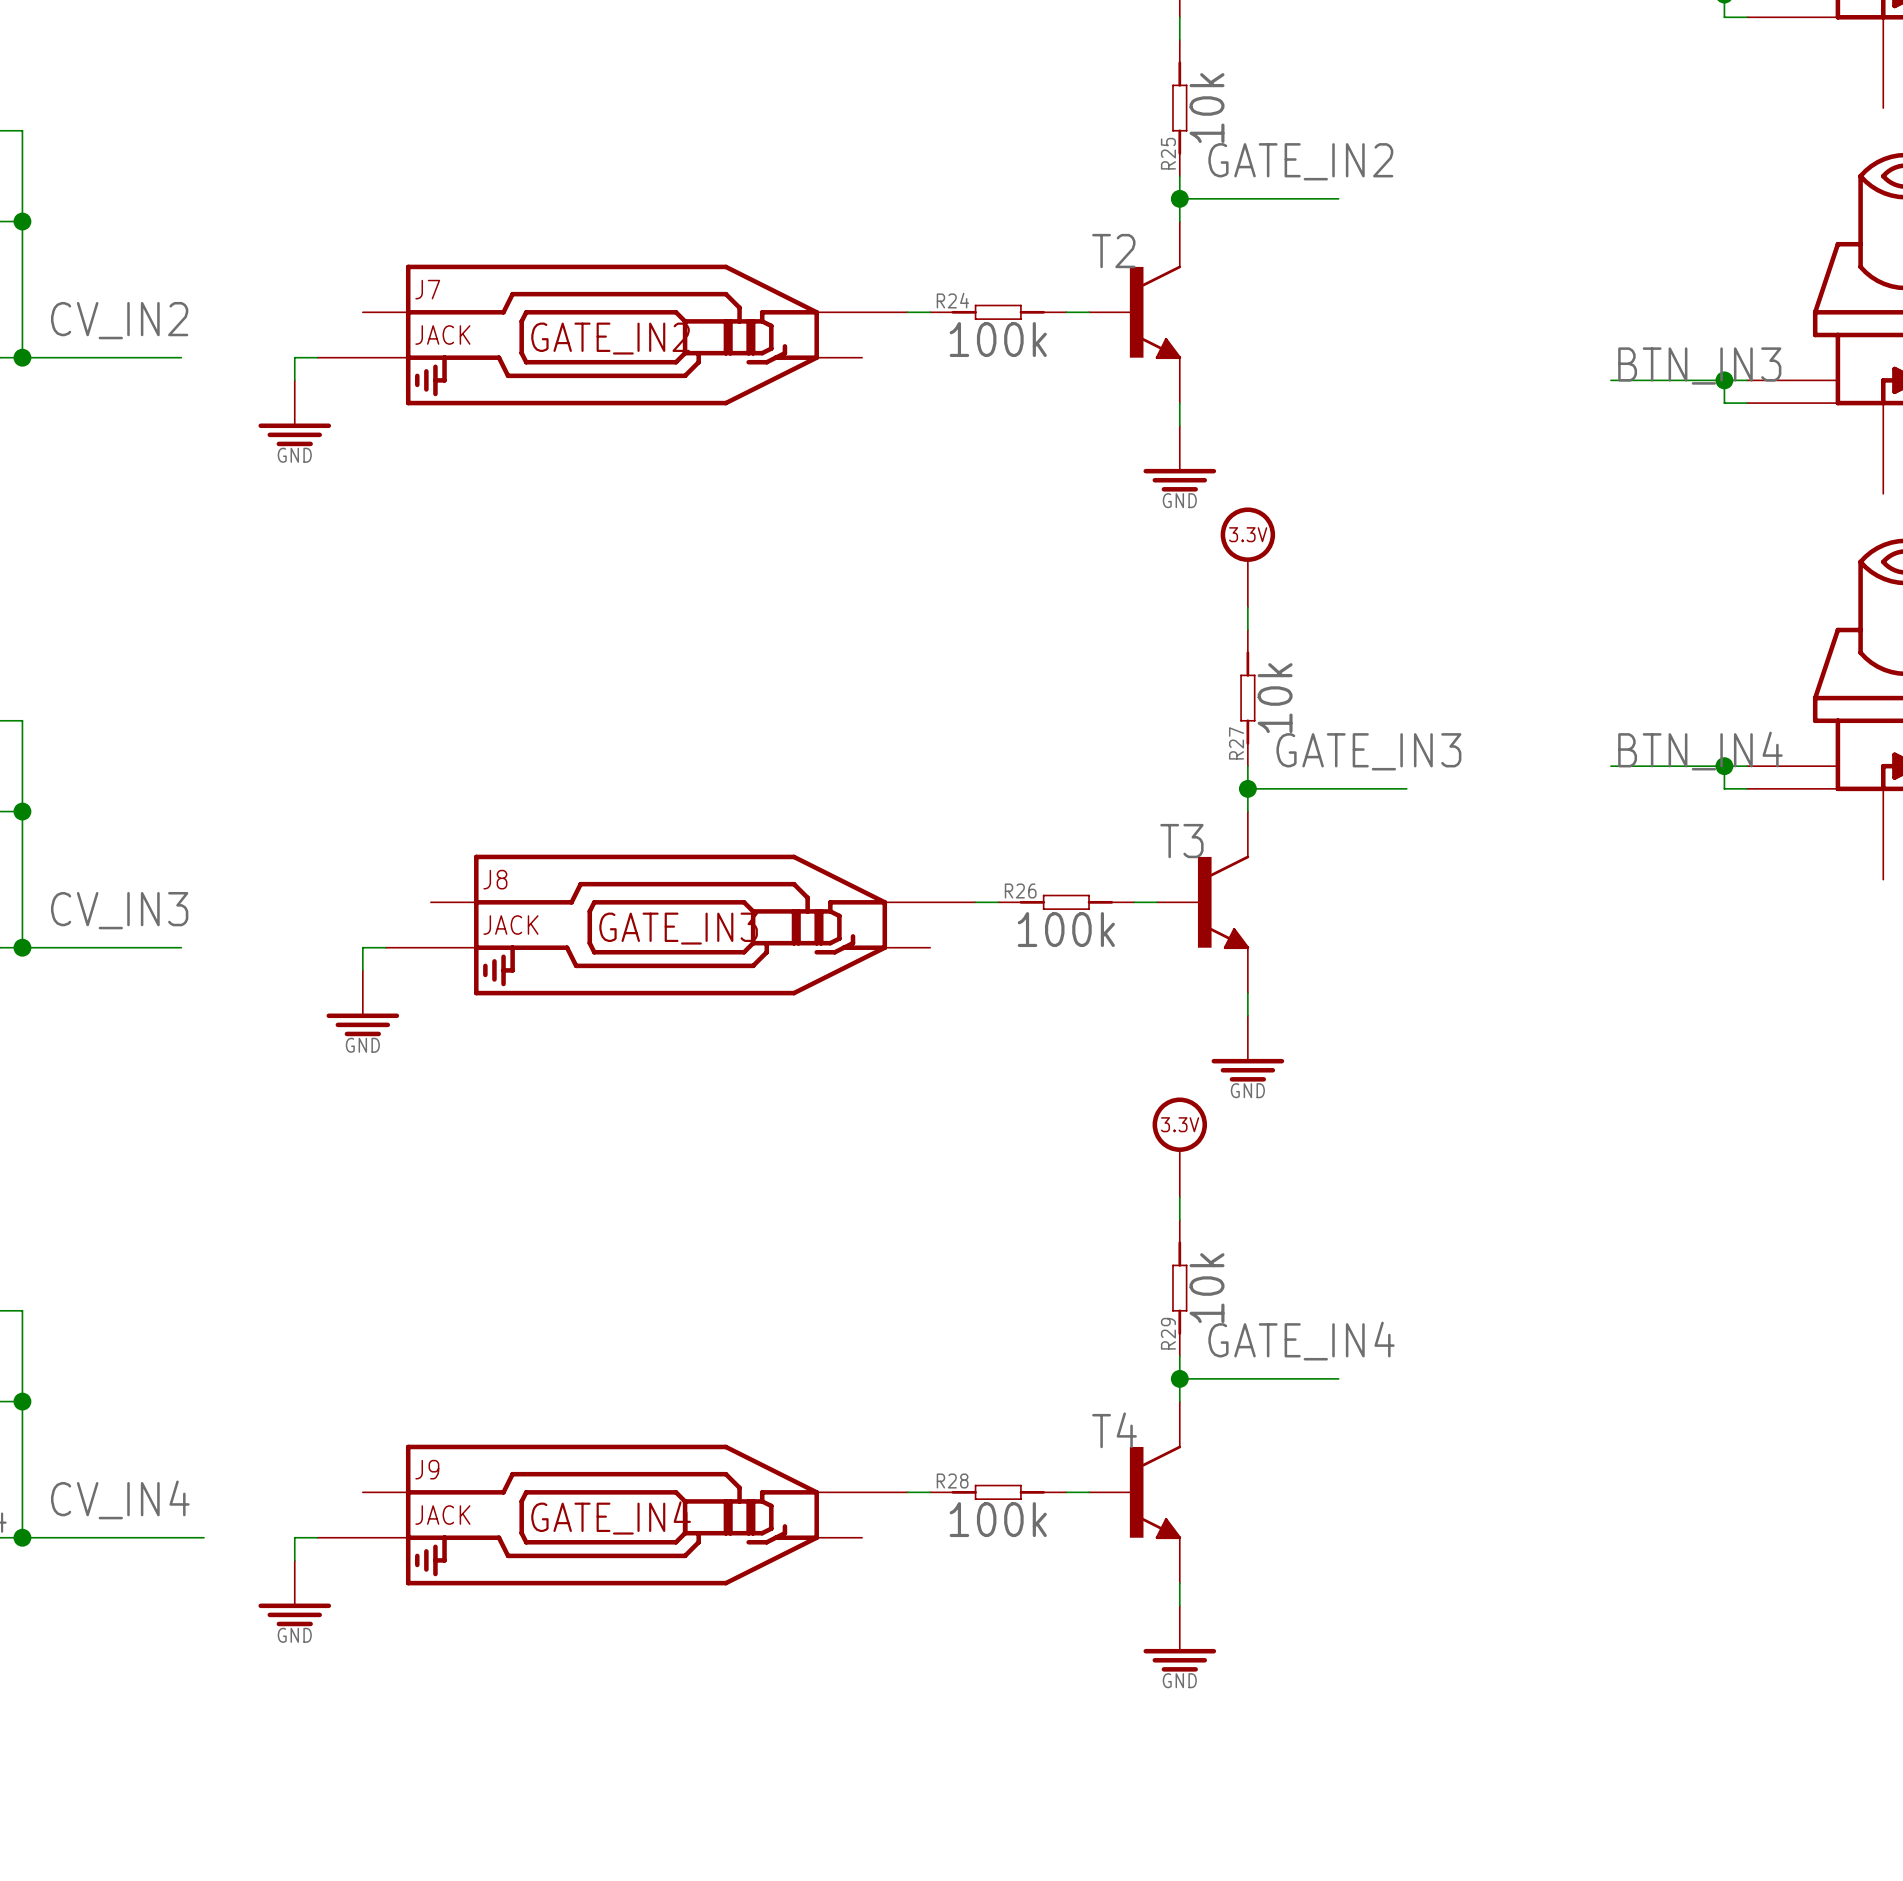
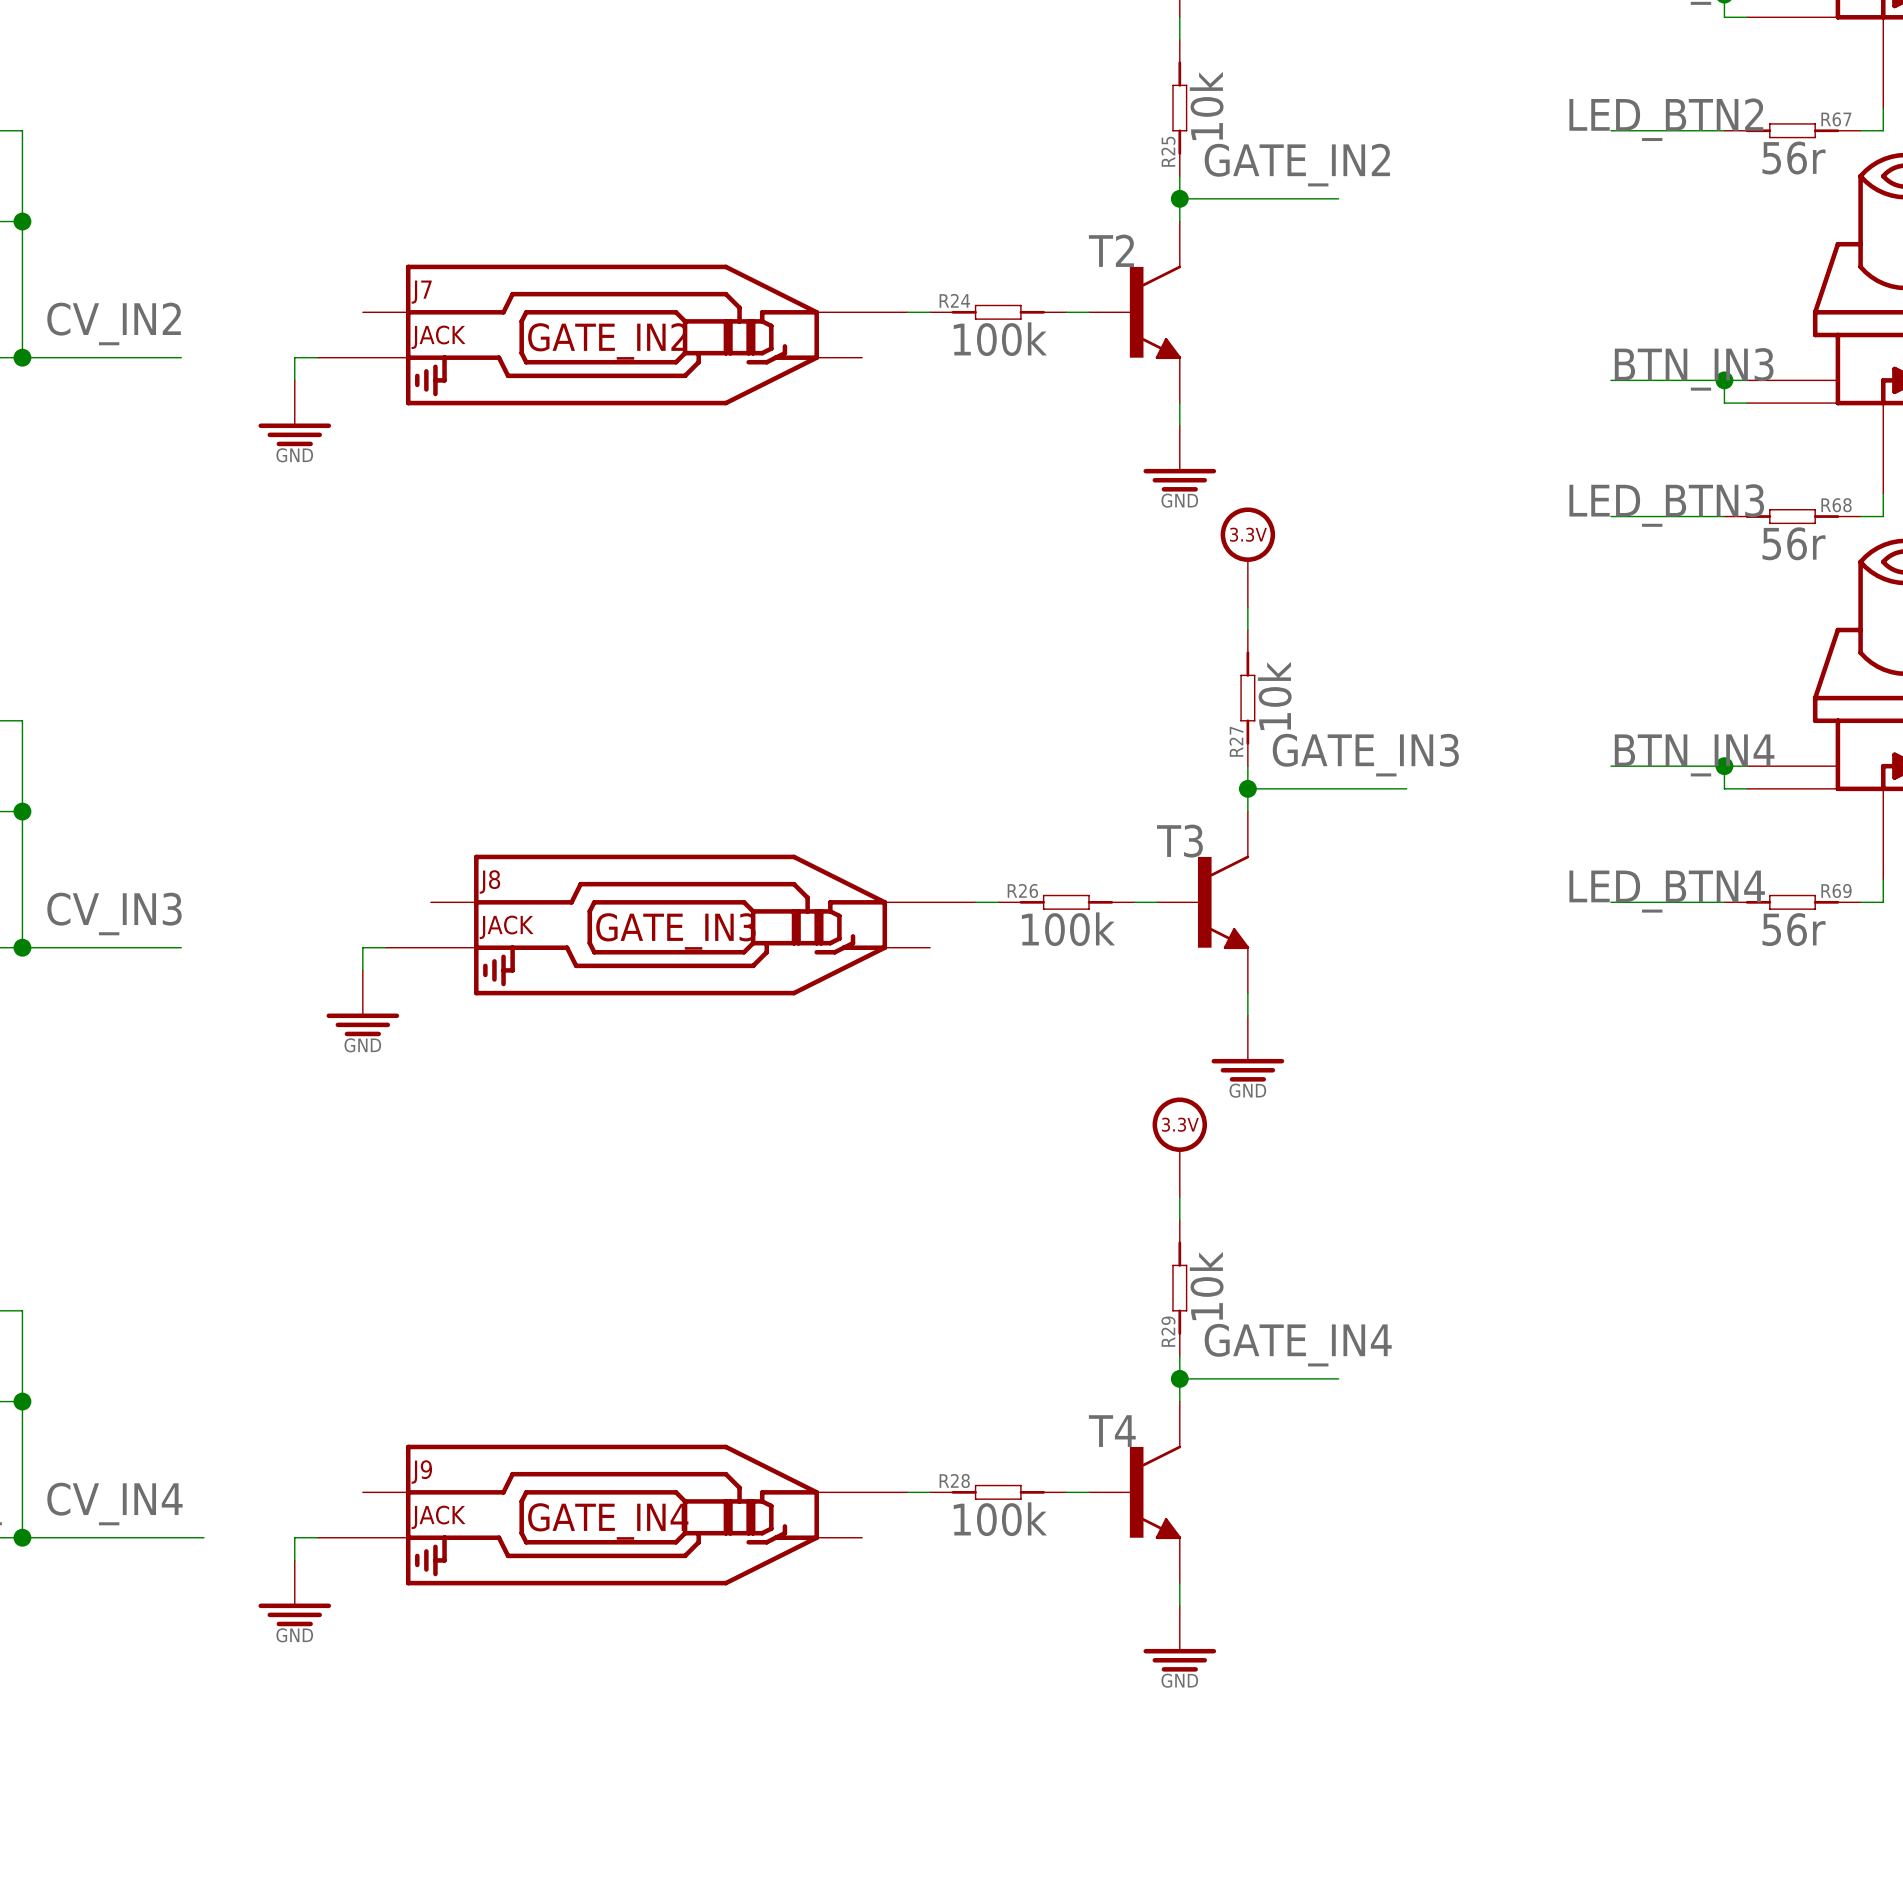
wire: none -> (1883, 108) (1883, 130) (1860, 130)
label: none -> LED_BTN2 (1666, 119)
wire: none -> (1610, 130) (1724, 130)
R67: none -> 56r (1792, 130)
wire: none -> (1883, 493) (1883, 516) (1860, 516)
label: none -> LED_BTN3 (1666, 505)
wire: none -> (1610, 516) (1724, 516)
R68: none -> 56r (1792, 516)
wire: none -> (1883, 879) (1883, 902) (1860, 902)
label: none -> LED_BTN4 (1667, 891)
wire: none -> (1610, 902) (1724, 902)
R69: none -> 56r (1792, 902)

